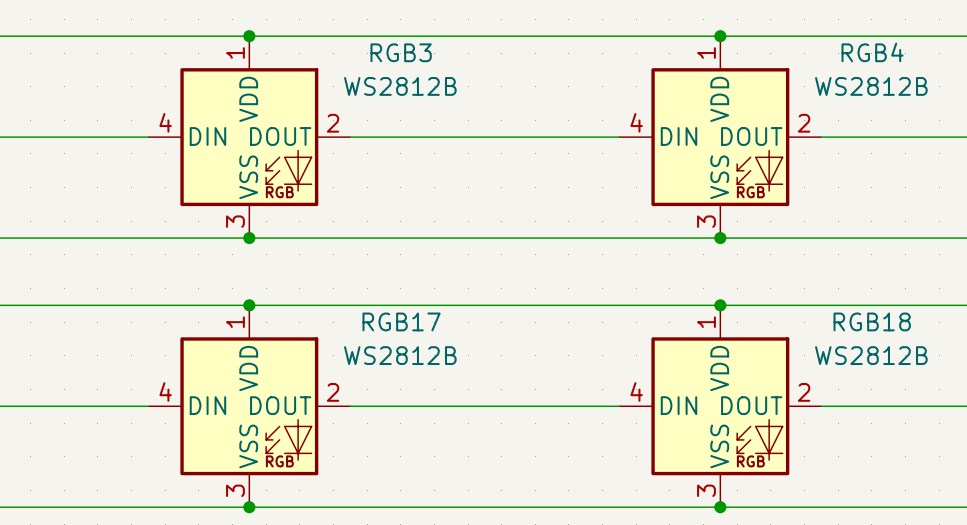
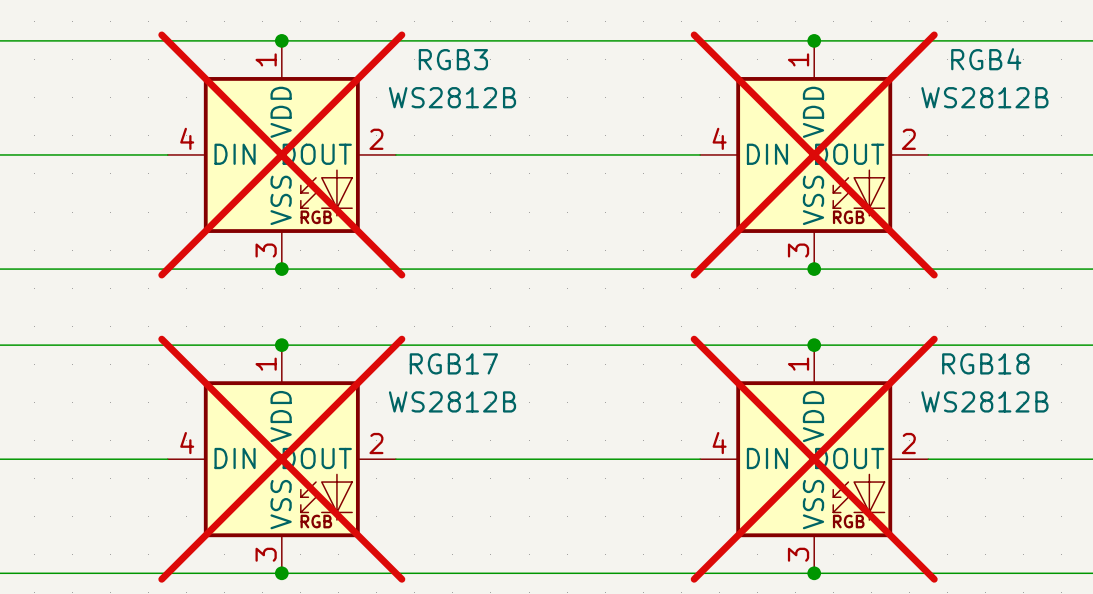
RGB3 do-not-place cross: none -> (281, 154)
RGB4 do-not-place cross: none -> (814, 154)
RGB17 do-not-place cross: none -> (281, 459)
RGB18 do-not-place cross: none -> (814, 459)

